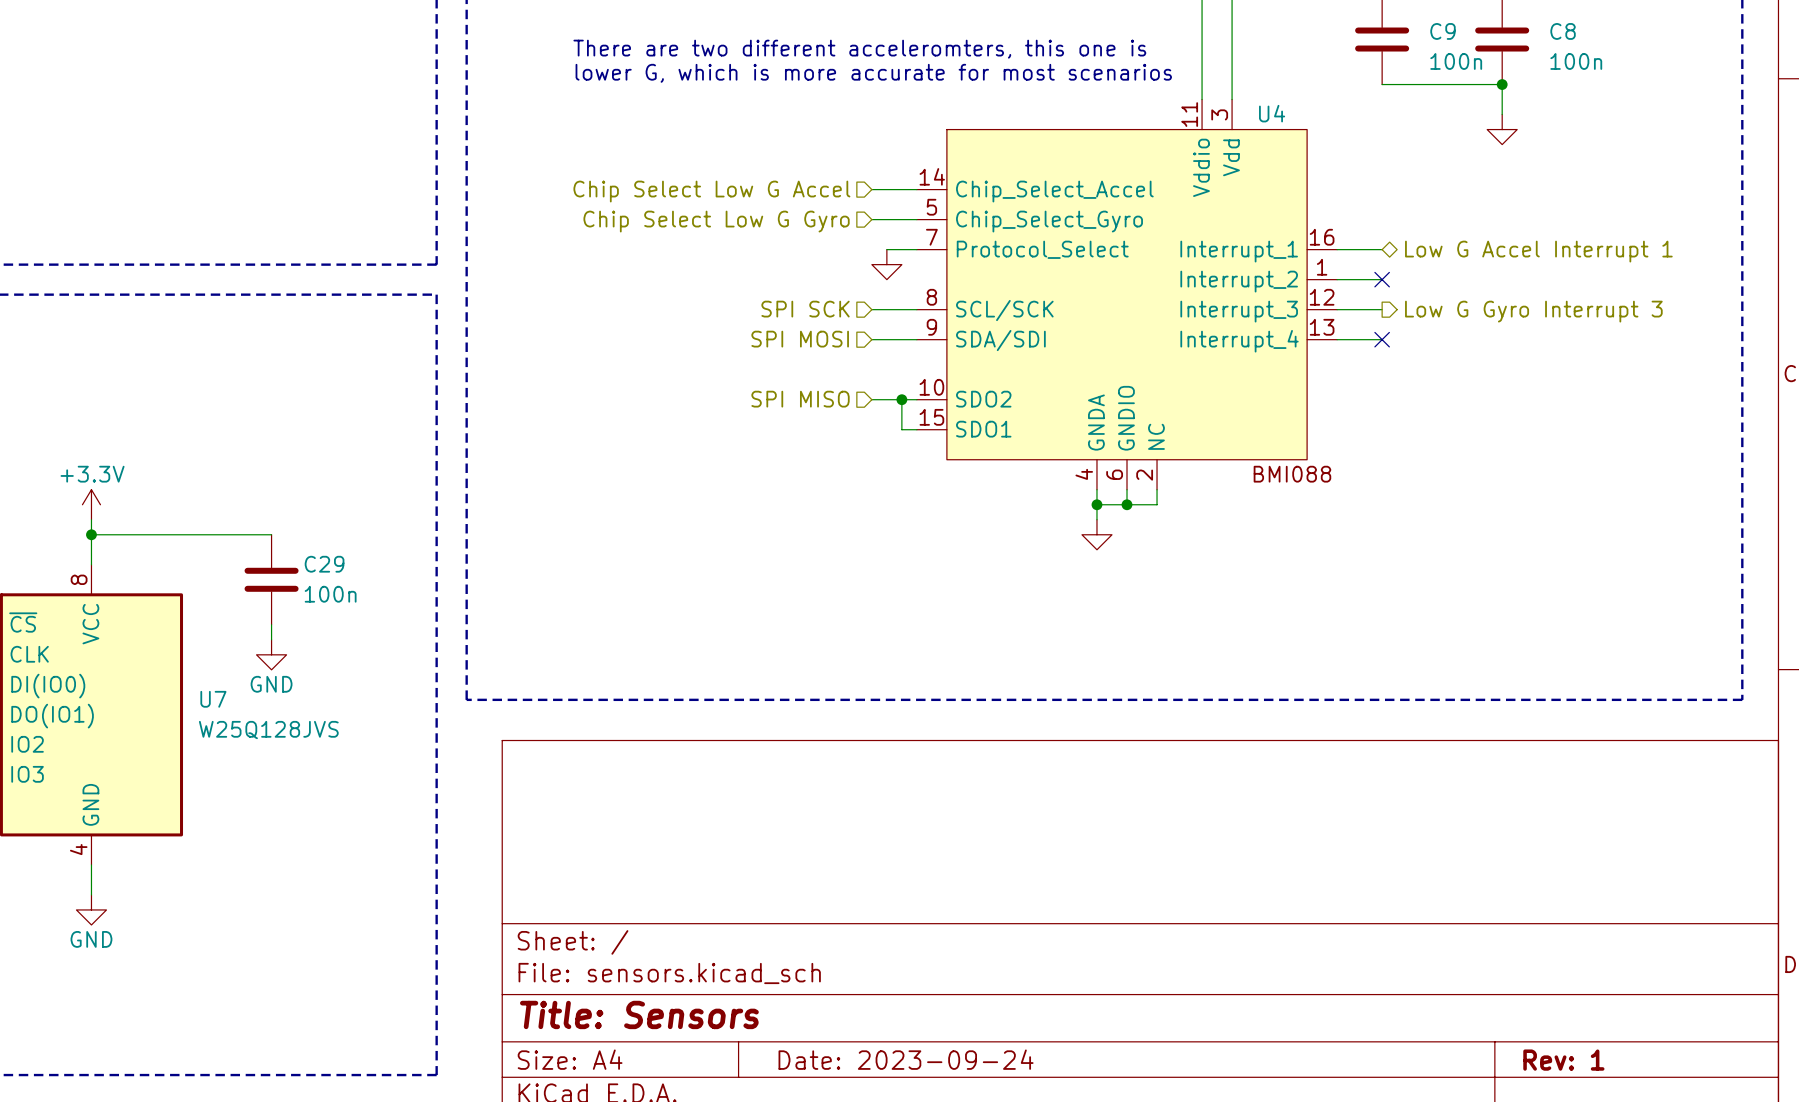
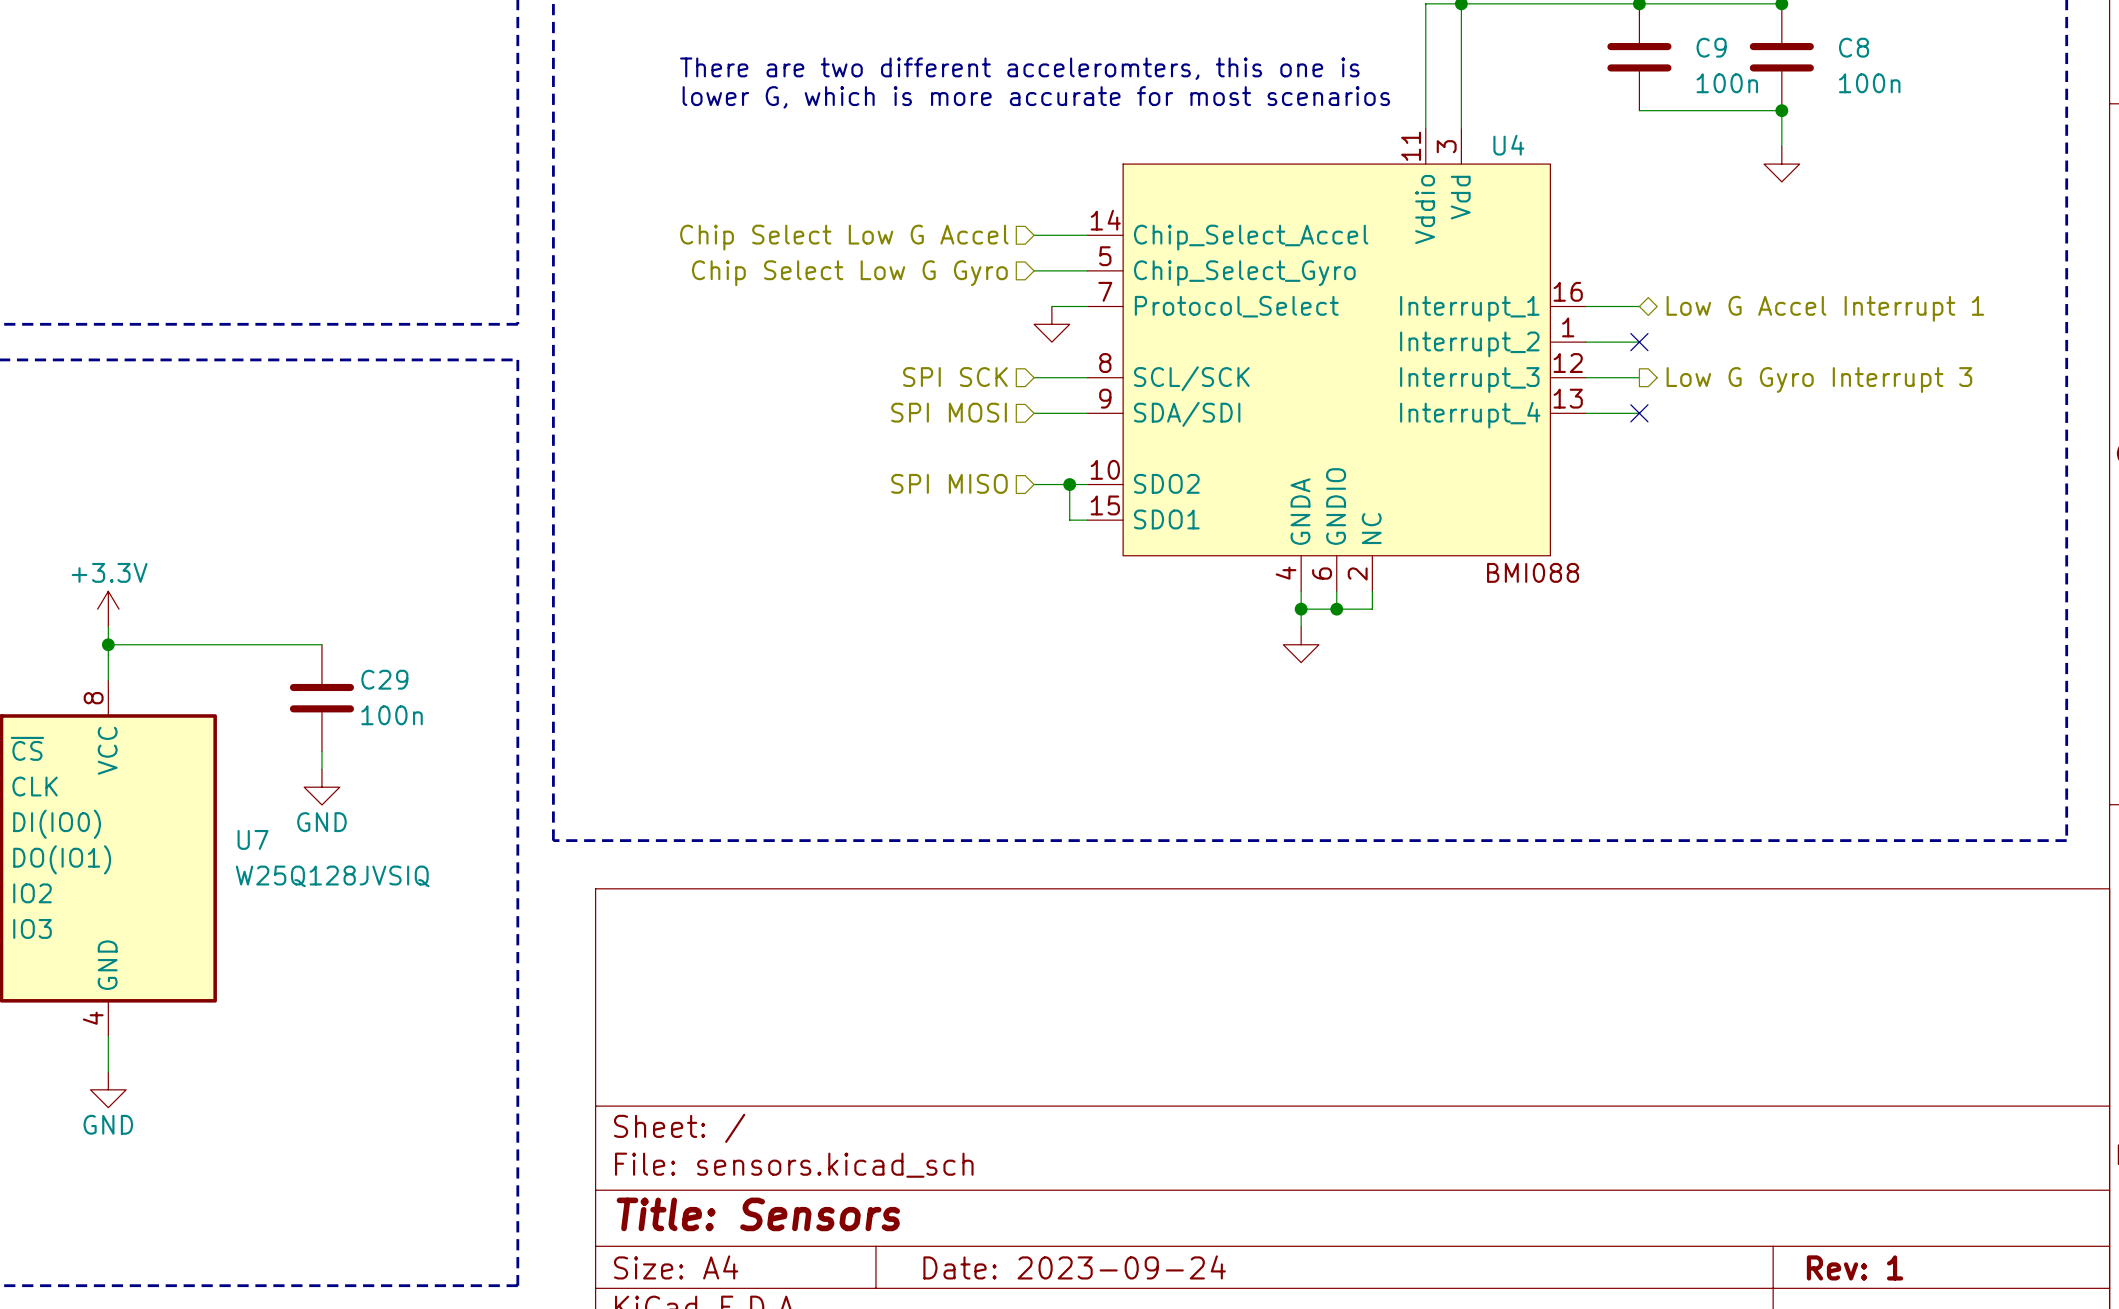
U7 value: W25Q128JVS (268, 730) -> W25Q128JVSIQ (332, 876)

